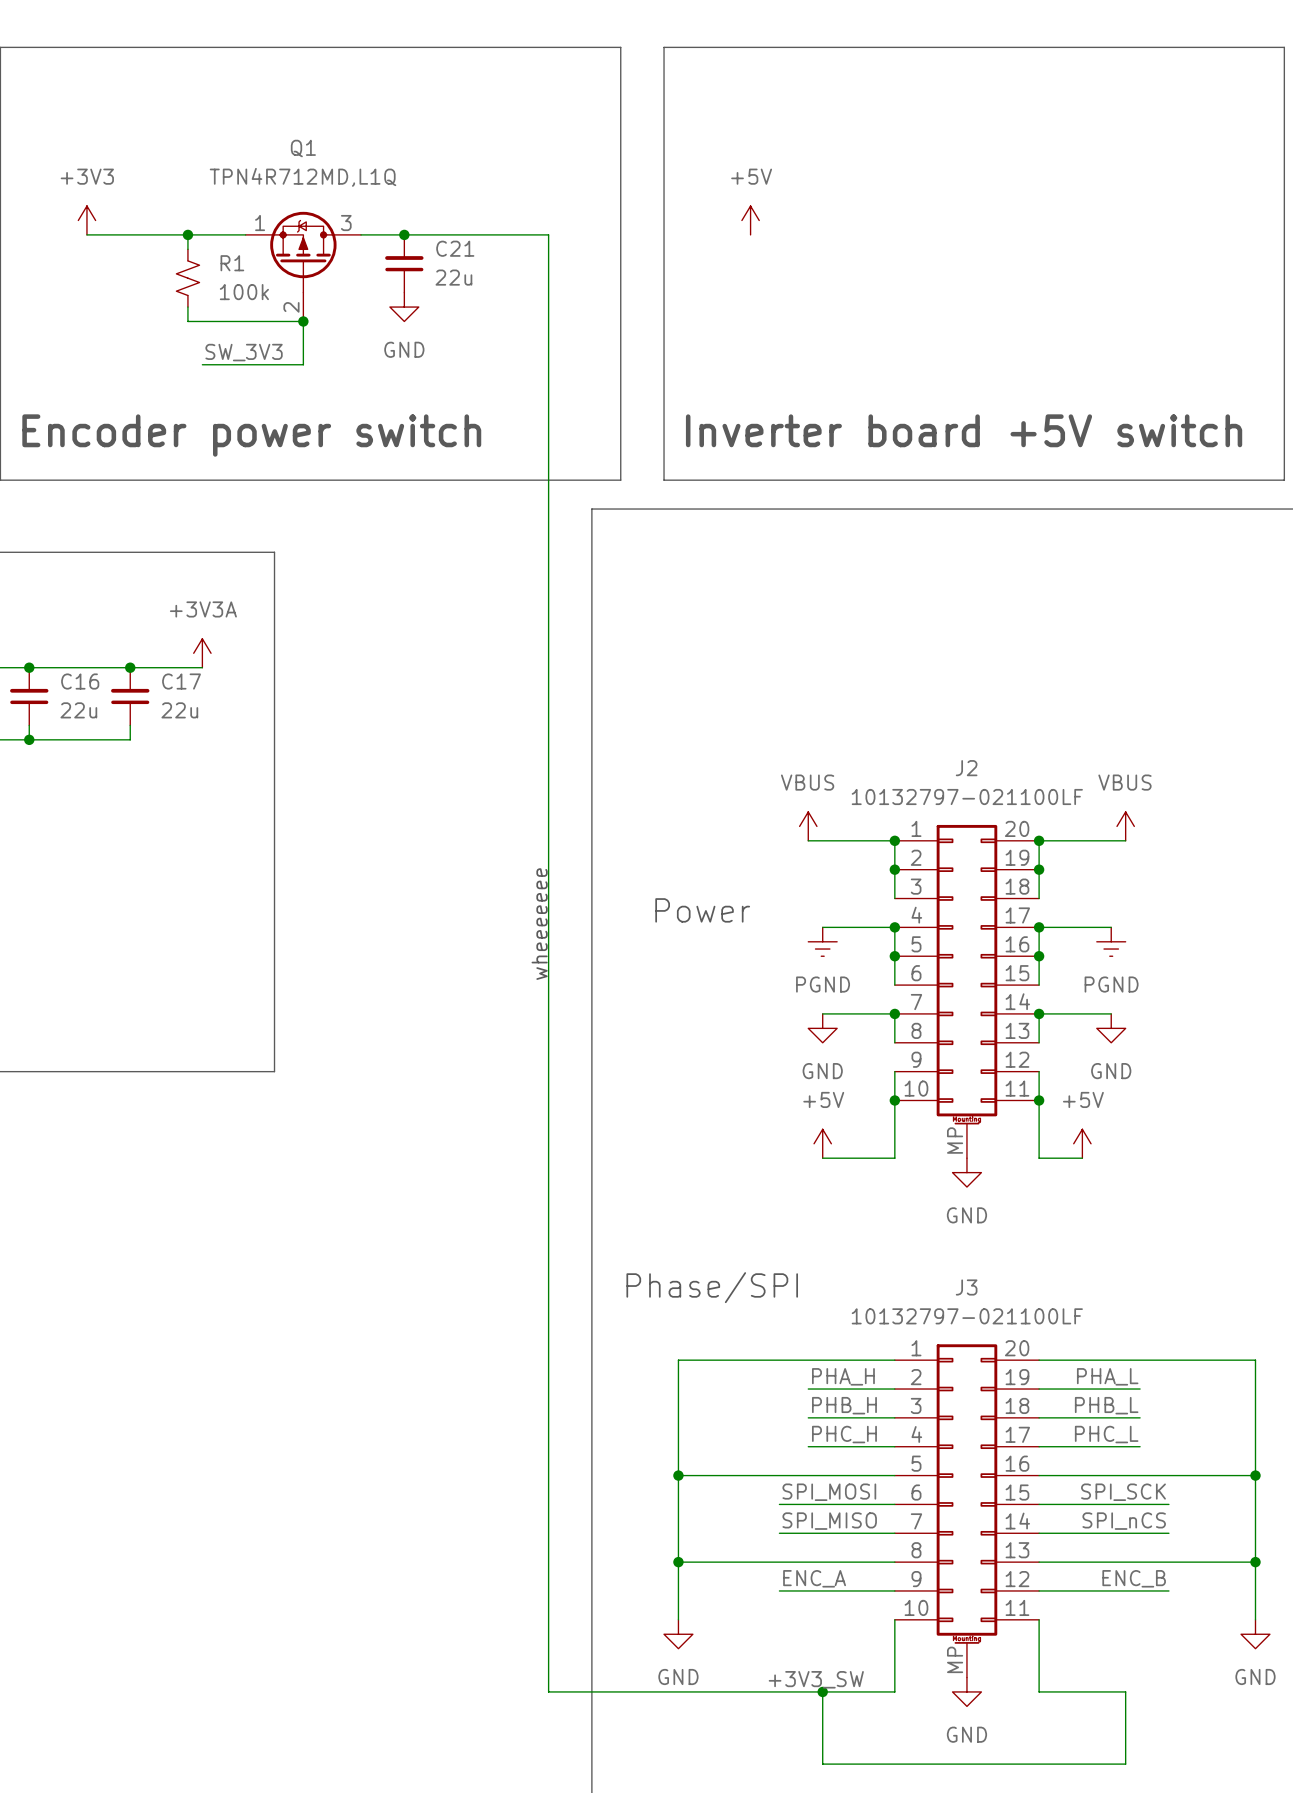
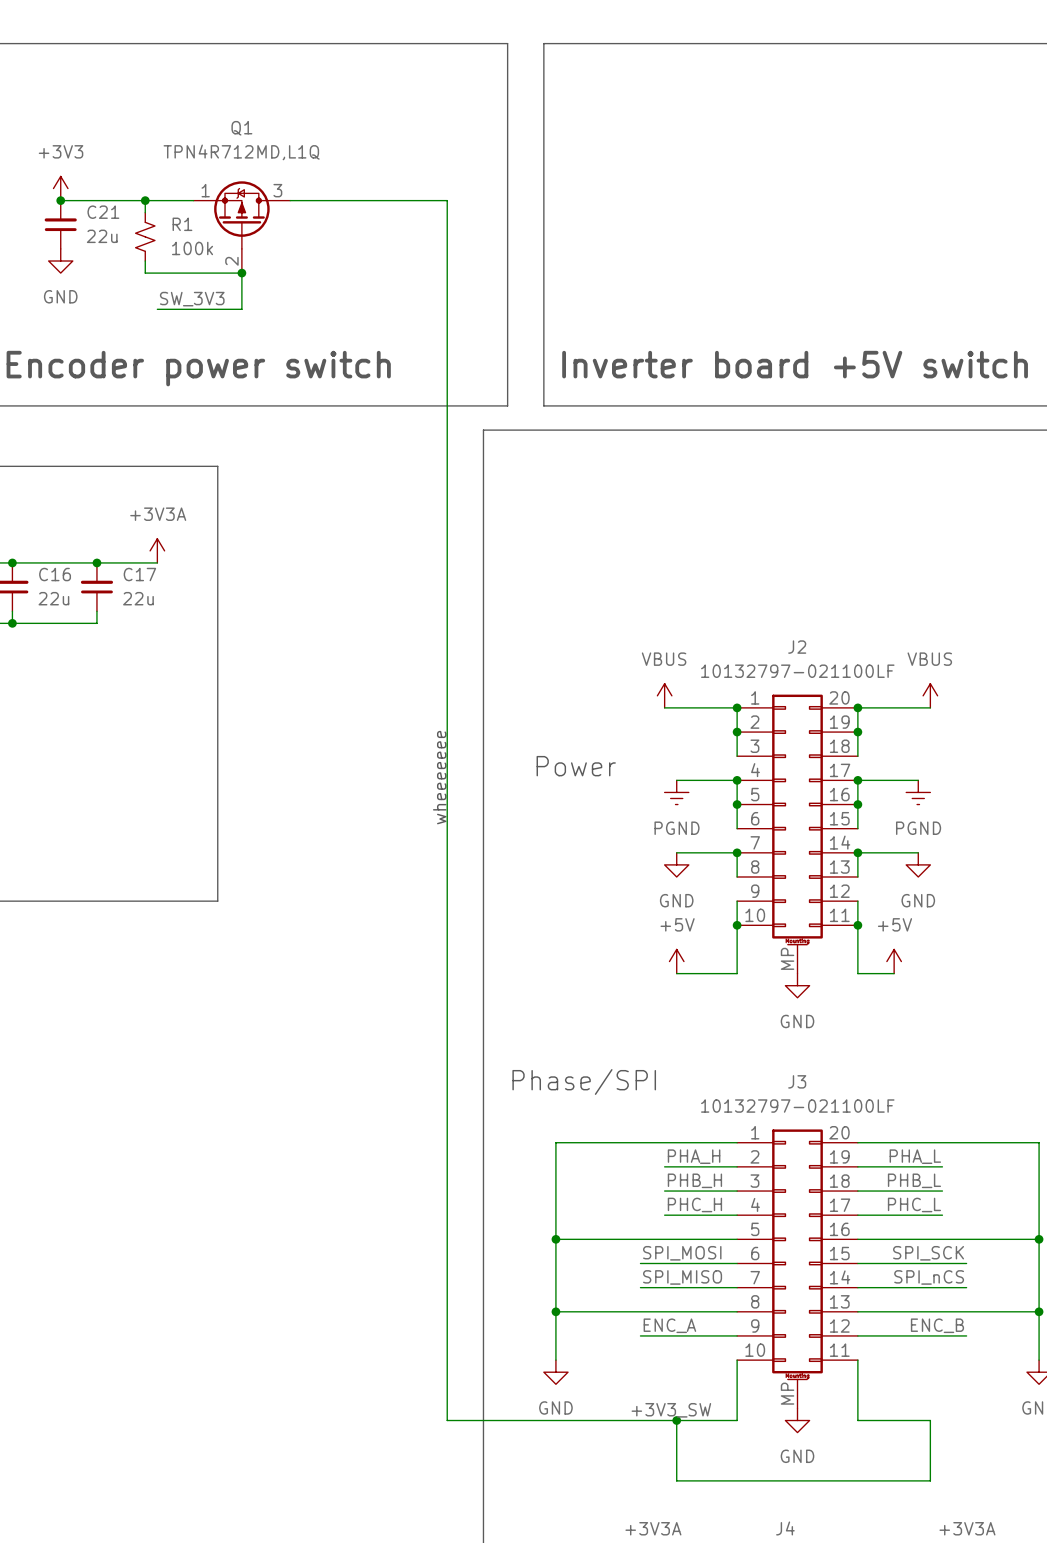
power symbol: +5V (750, 220) -> none
junction: none -> (60, 200)
junction: (404, 234) -> none
C21 position: (404, 263) -> (60, 224)
power symbol: none -> GND (60, 261)
power symbol: GND (404, 307) -> none

